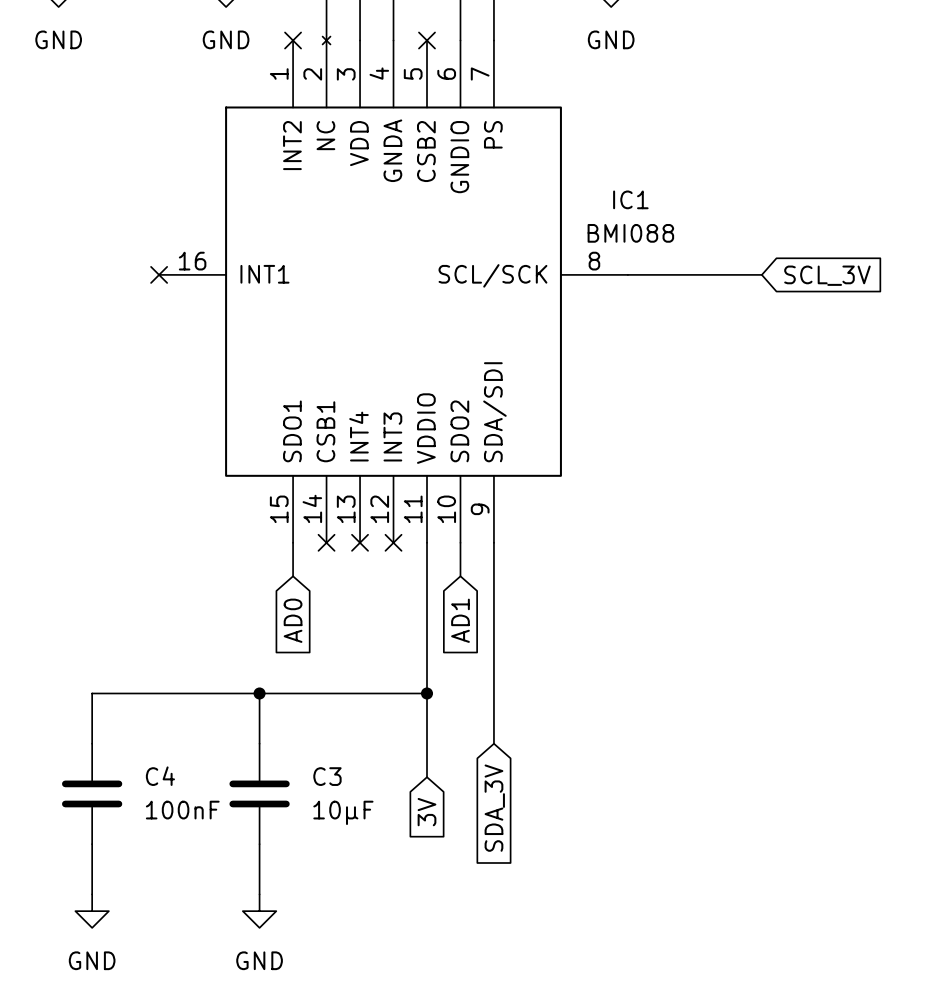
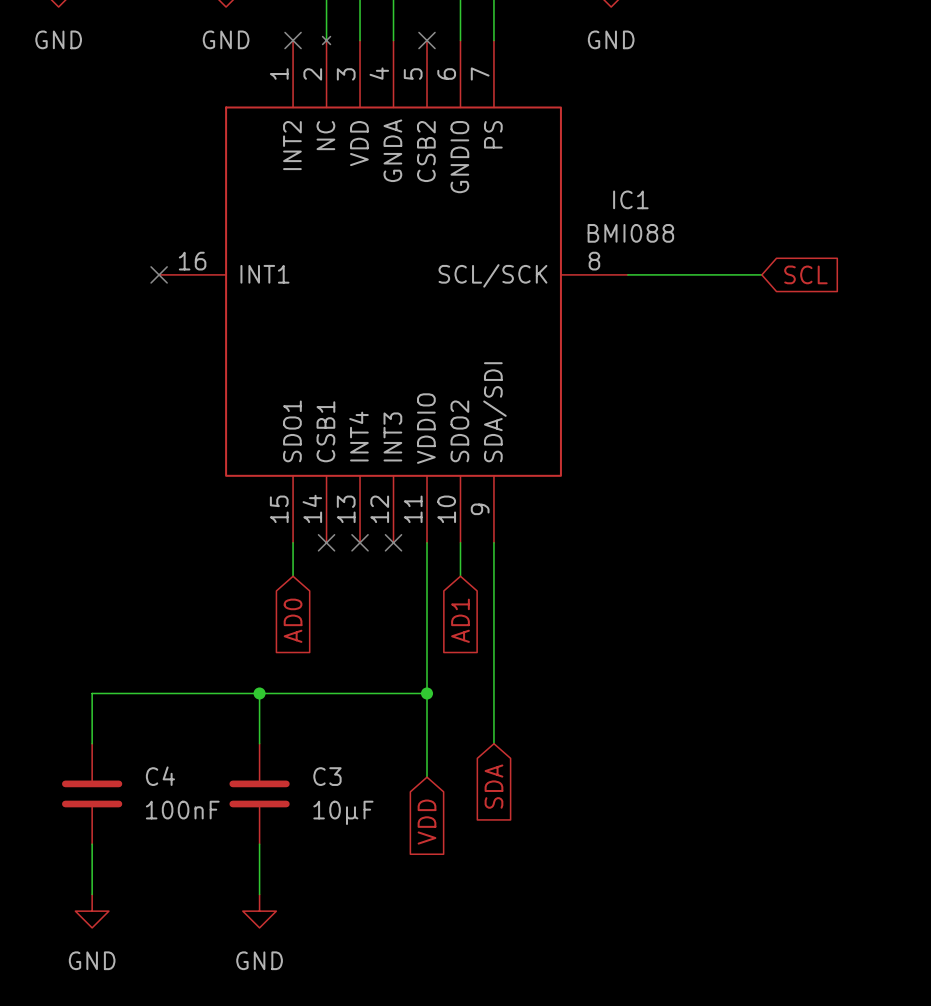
global label: SCL_3V (827, 275) -> SCL (805, 274)
global label: SDA_3V (494, 808) -> SDA (493, 786)
global label: 3V (427, 812) -> VDD (427, 822)

